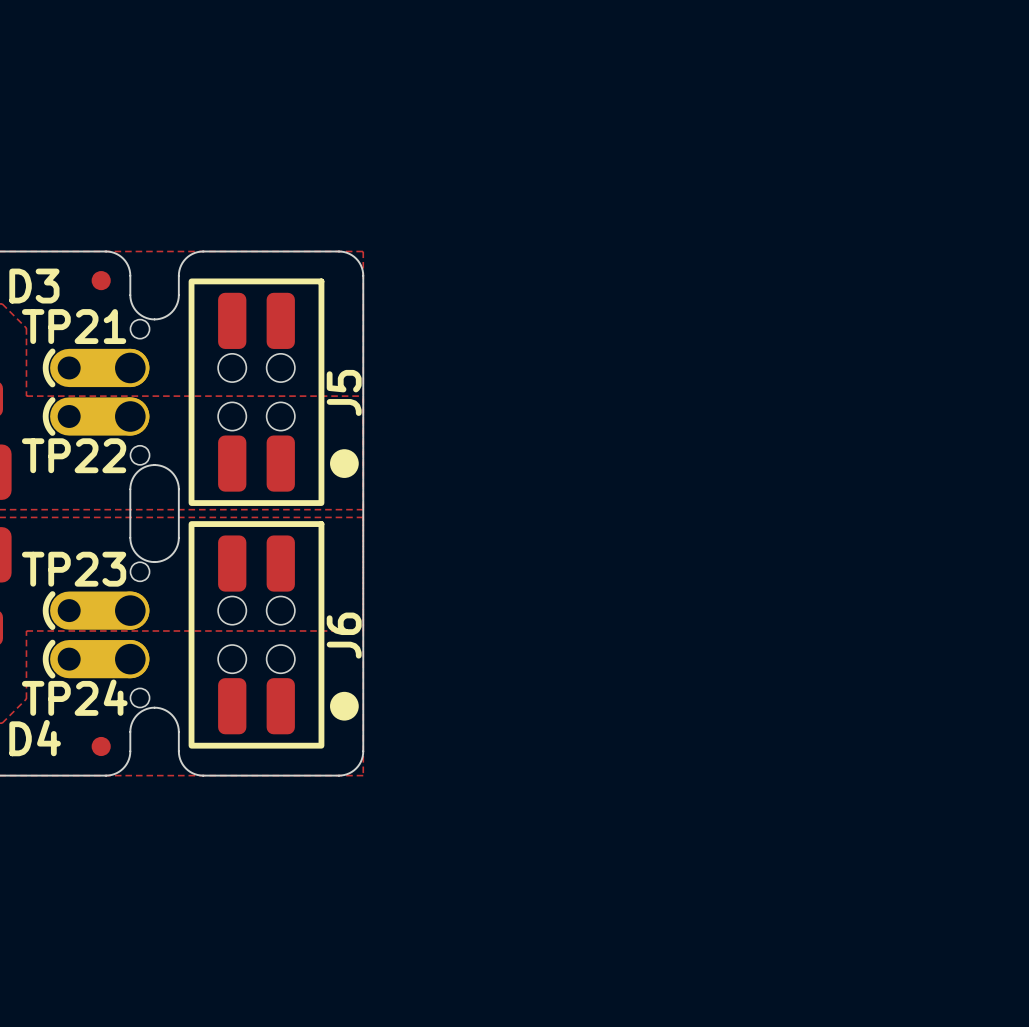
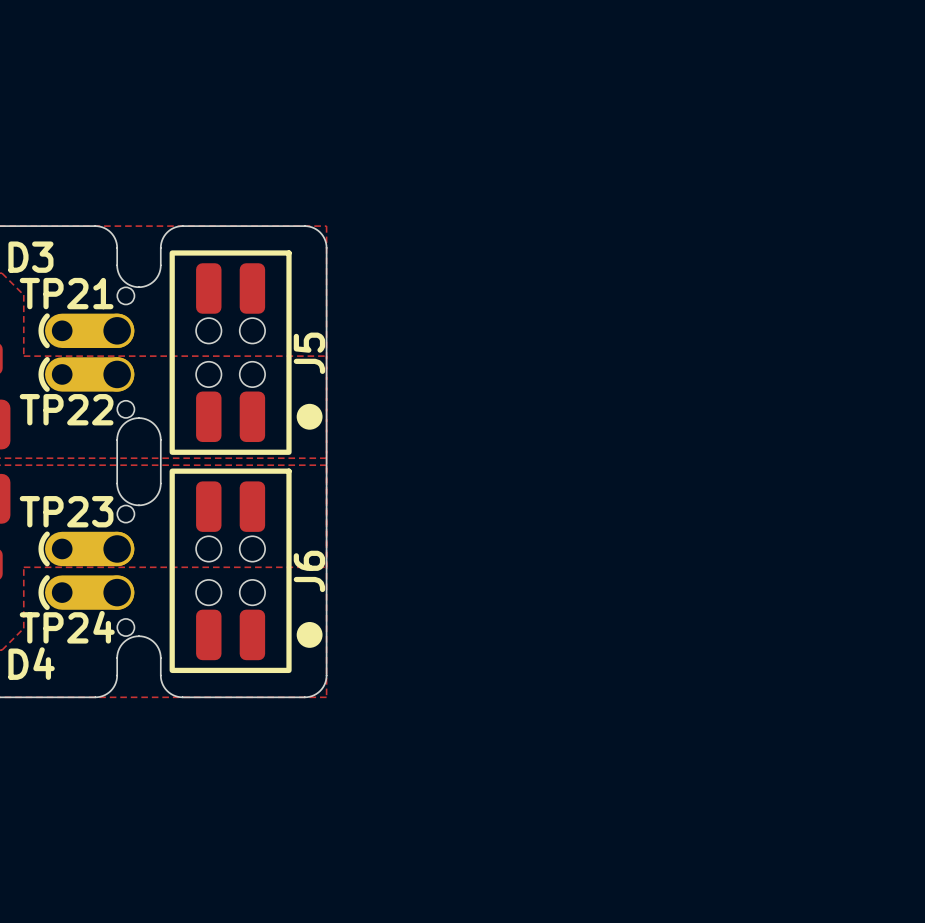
part: (101, 280) -> none
part: (101, 746) -> none

